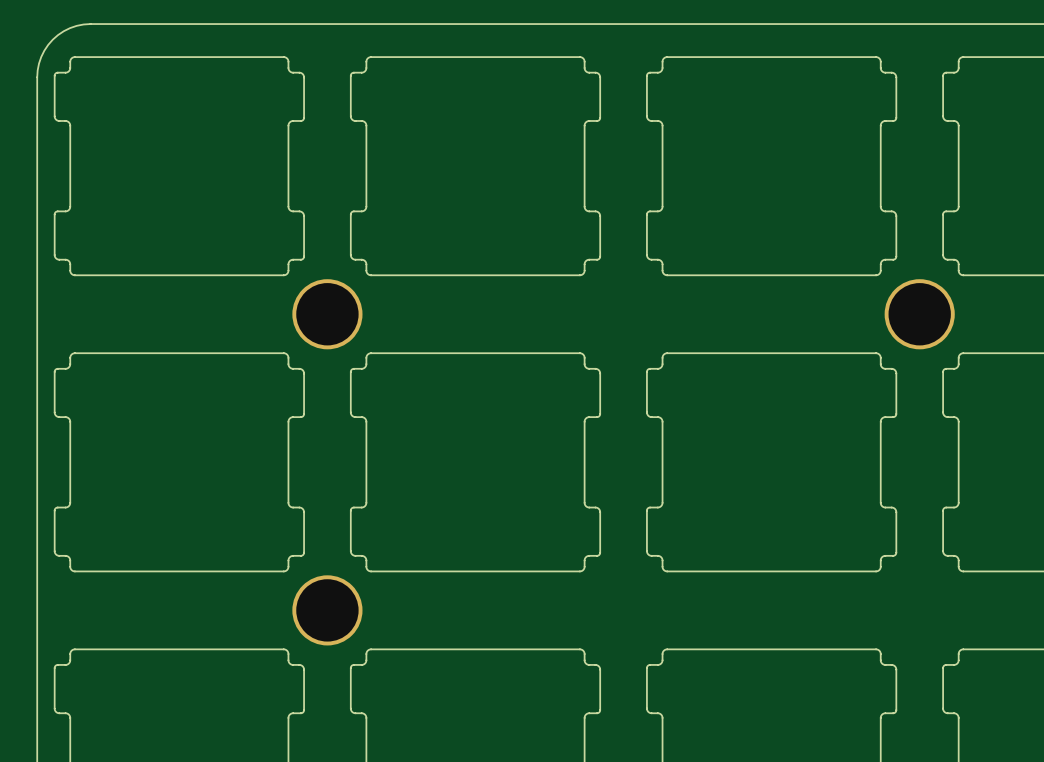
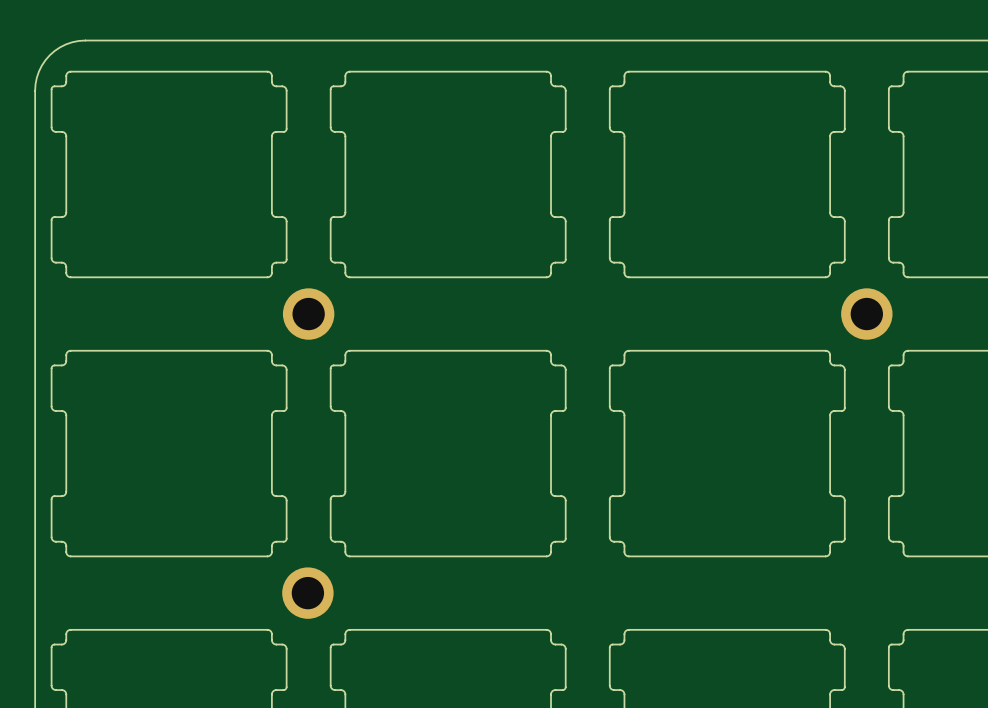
part footprint: [292, 279, 363, 350] -> [282, 288, 335, 340]
part footprint: [884, 279, 955, 350] -> [841, 288, 893, 340]
part footprint: [292, 575, 363, 646] -> [282, 567, 334, 619]

